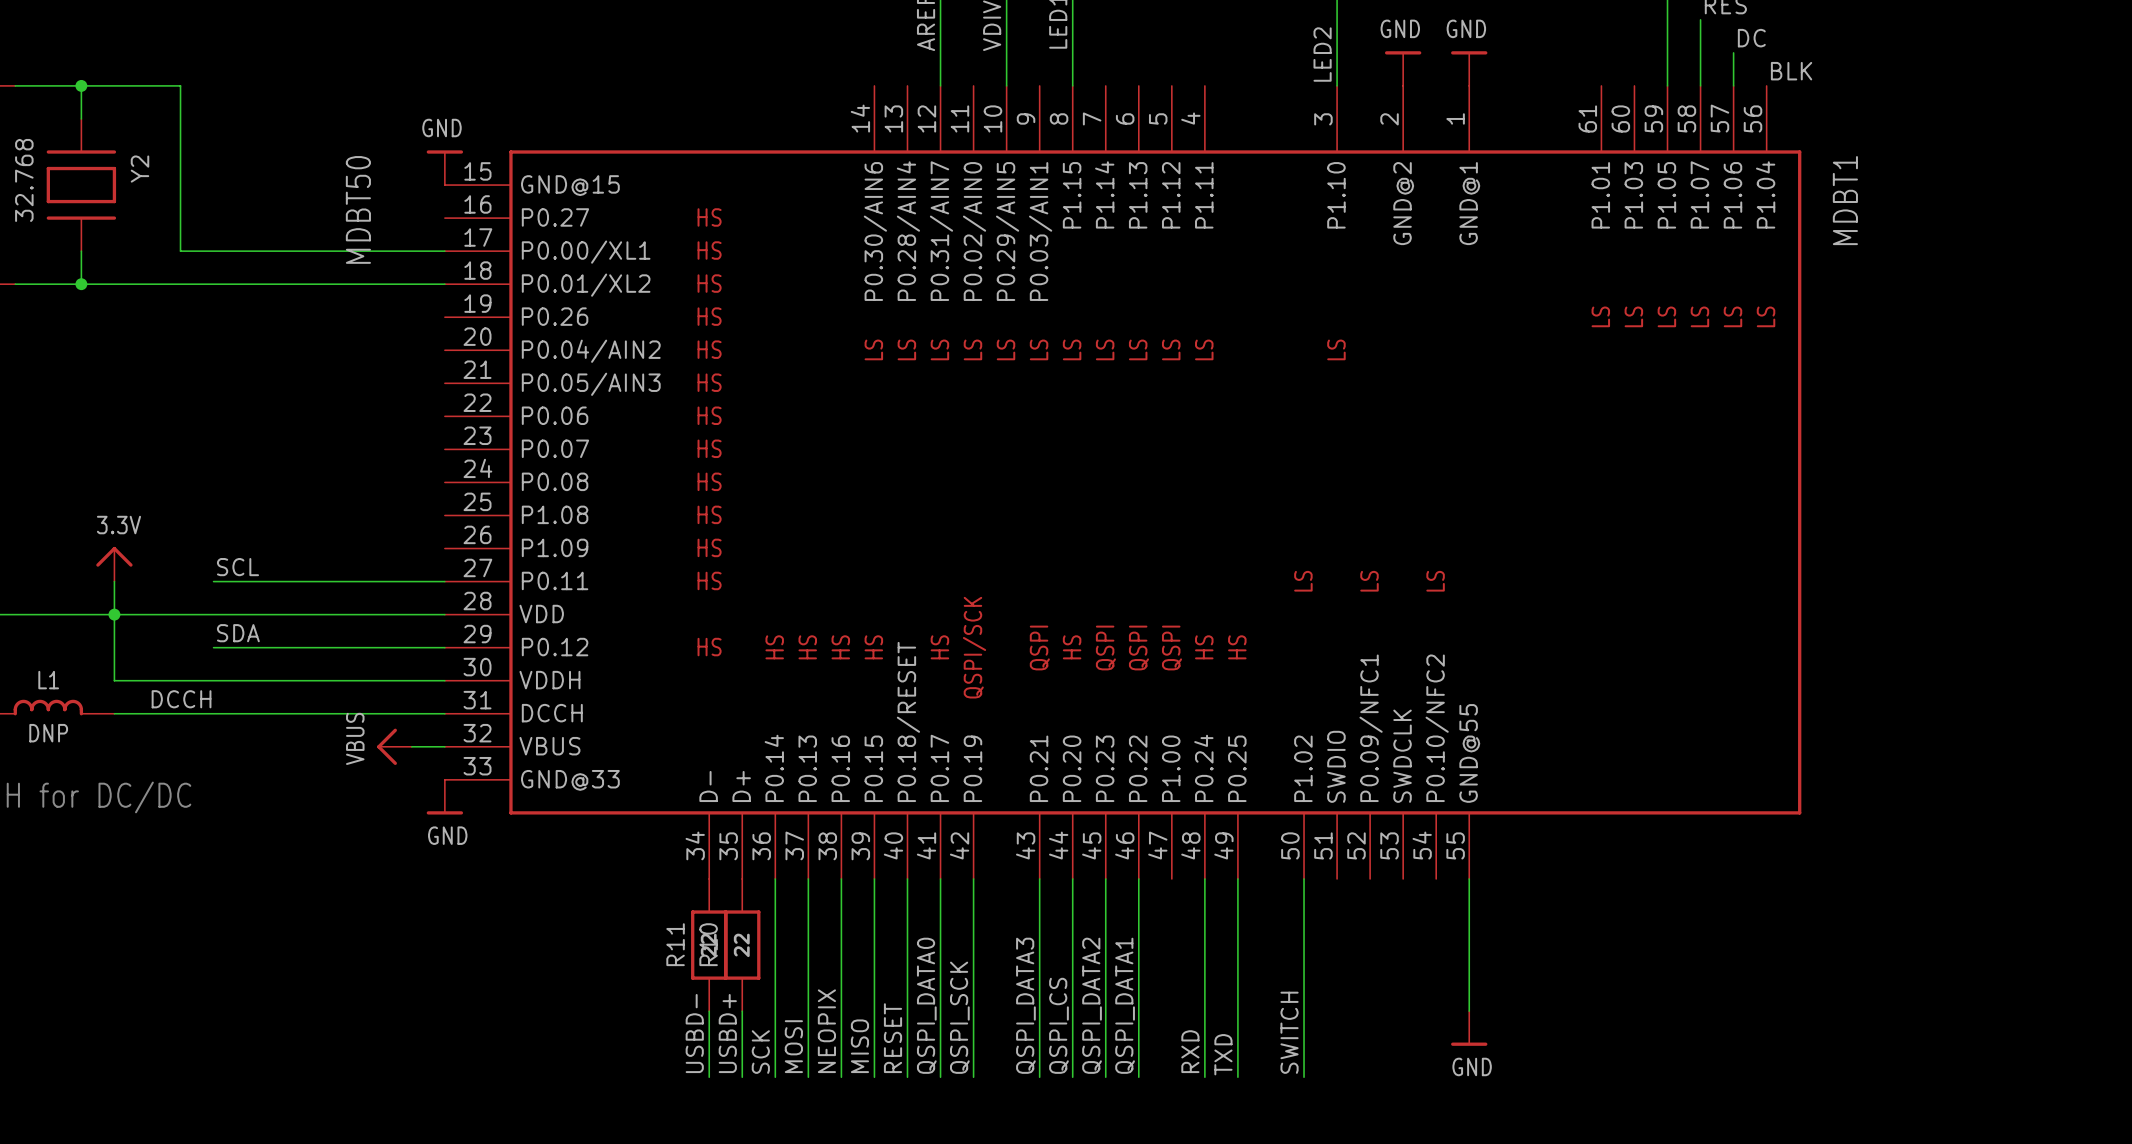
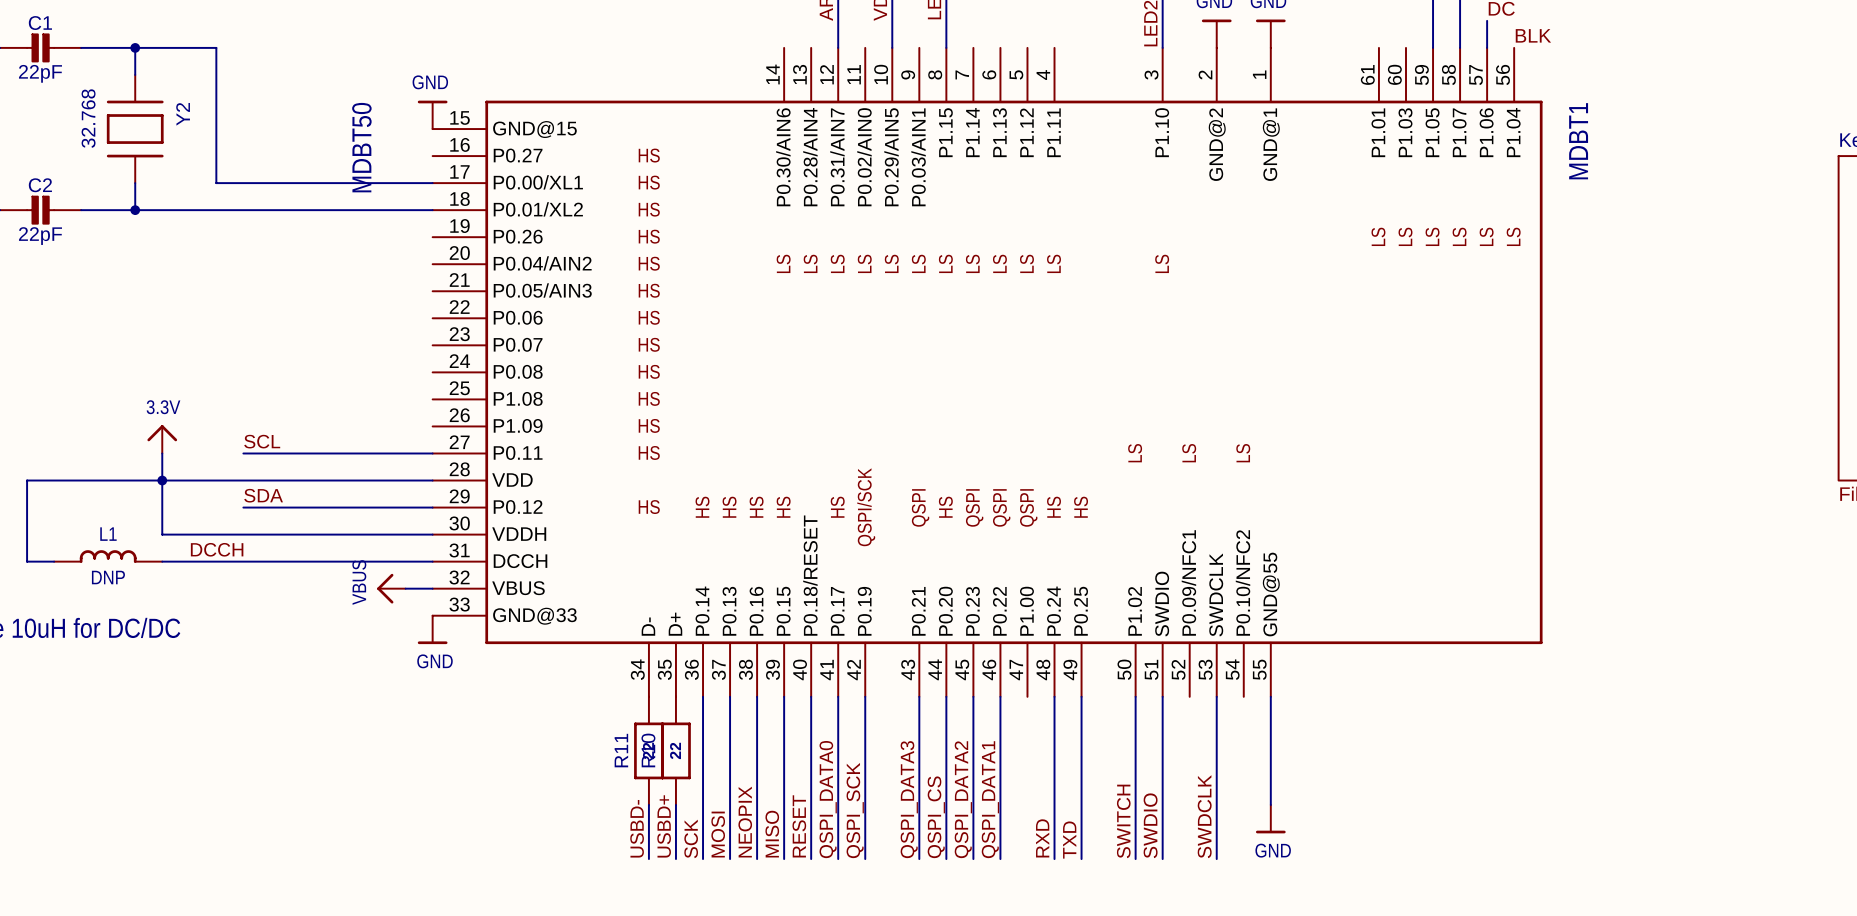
wire: none -> (1162, 696) (1162, 859)
wire: none -> (1216, 696) (1216, 859)
label: none -> SWDCLK (1204, 816)
label: none -> SWDIO (1150, 825)

